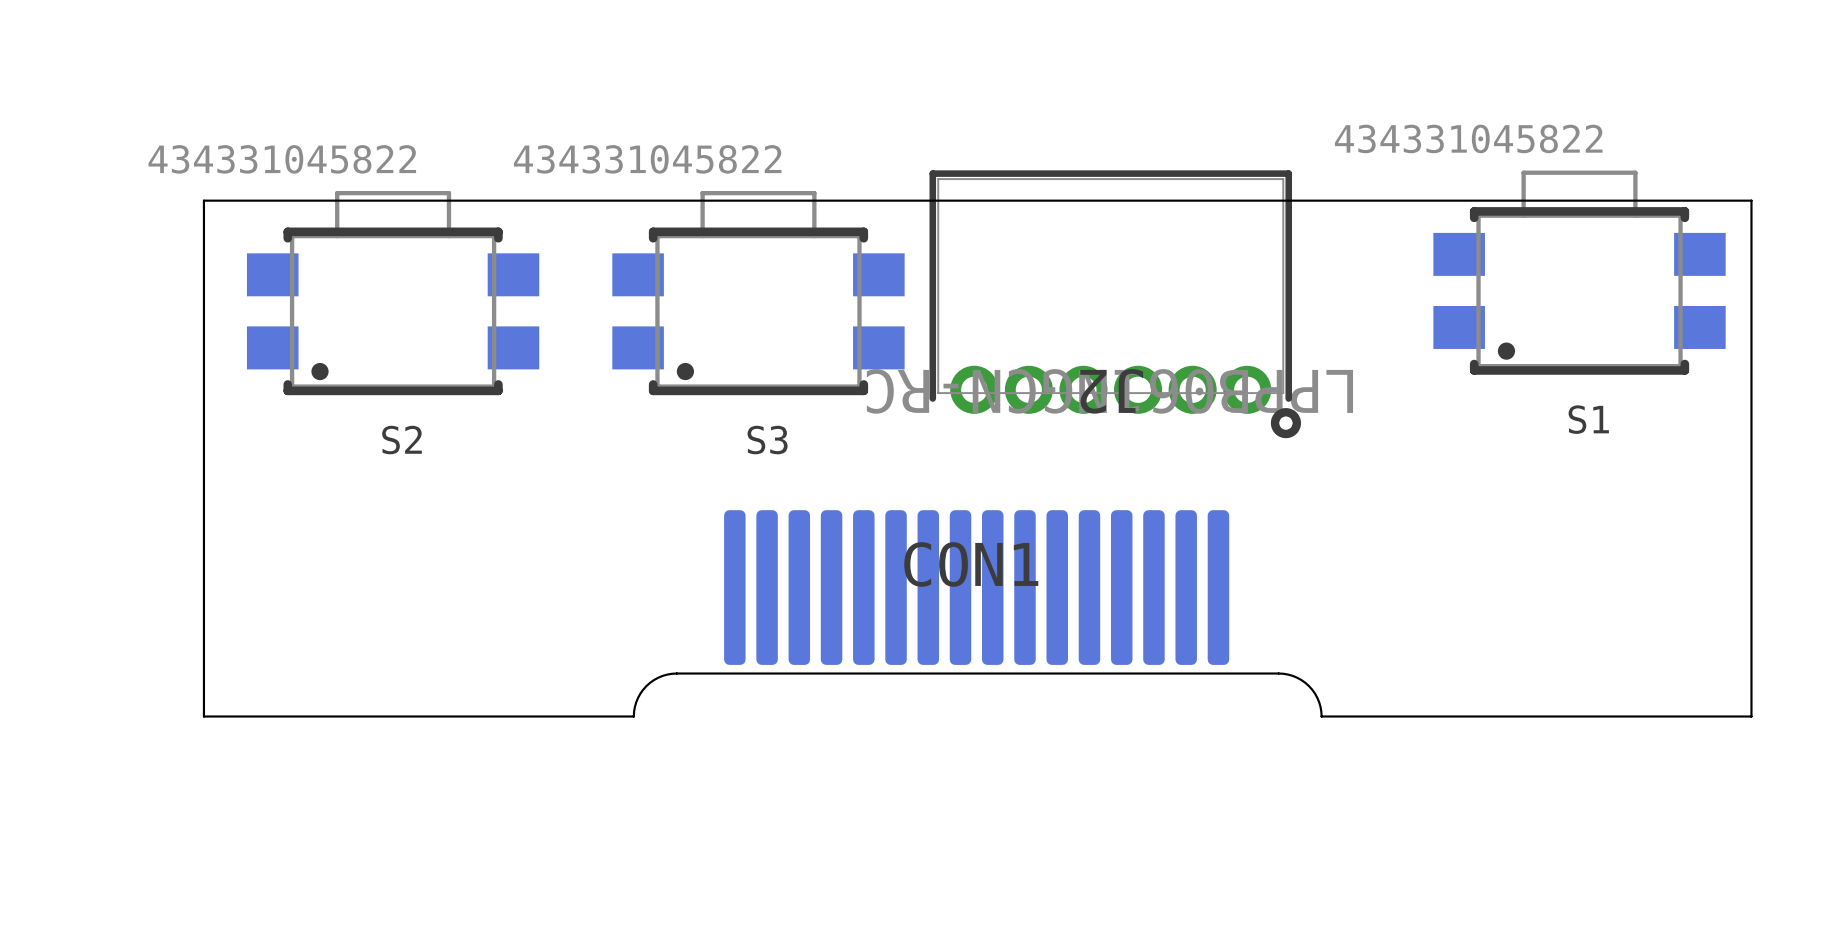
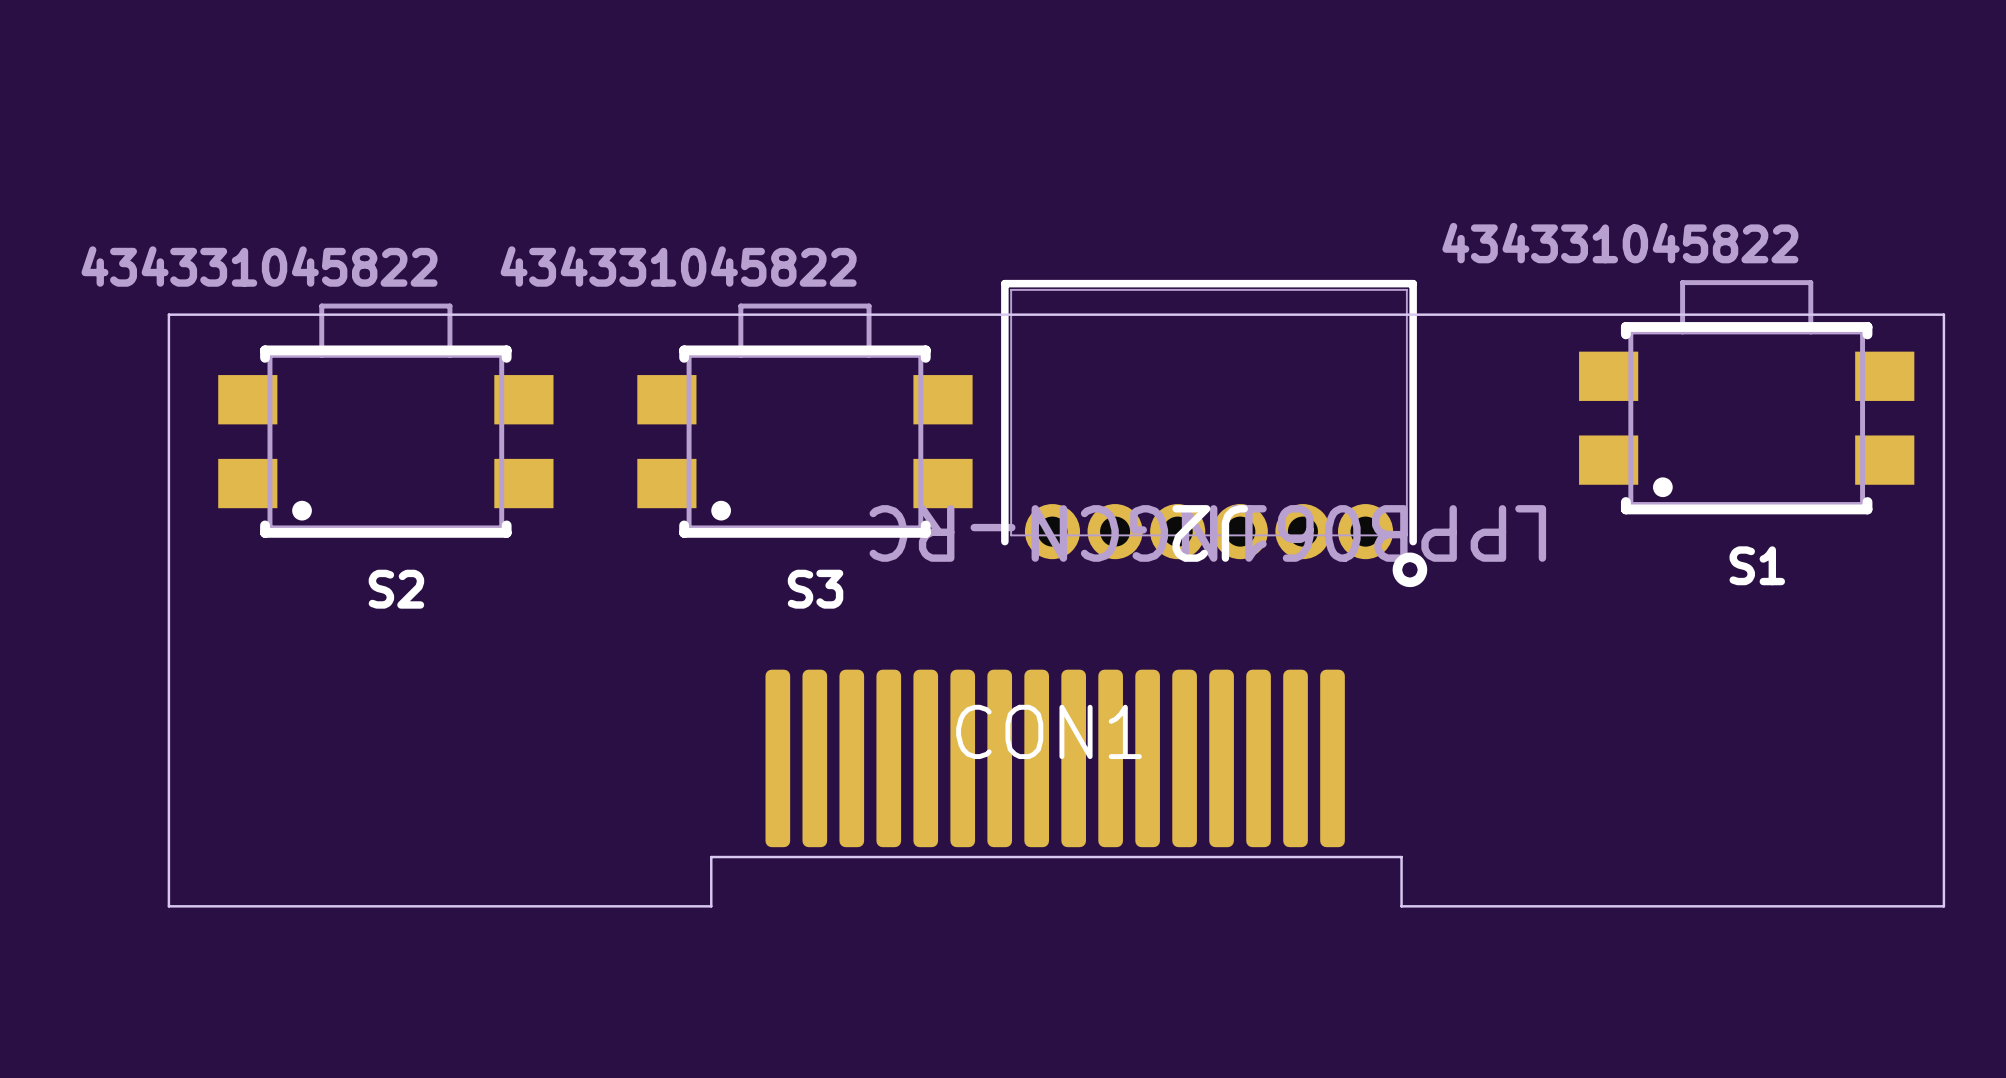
board edge: (676, 673) (658, 677) (646, 686) (636, 702) (633, 716) -> (711, 857) (711, 906) (661, 906)
board edge: (1278, 673) (1297, 677) (1309, 686) (1319, 702) (1321, 716) -> (1401, 857) (1401, 906) (1450, 906)

